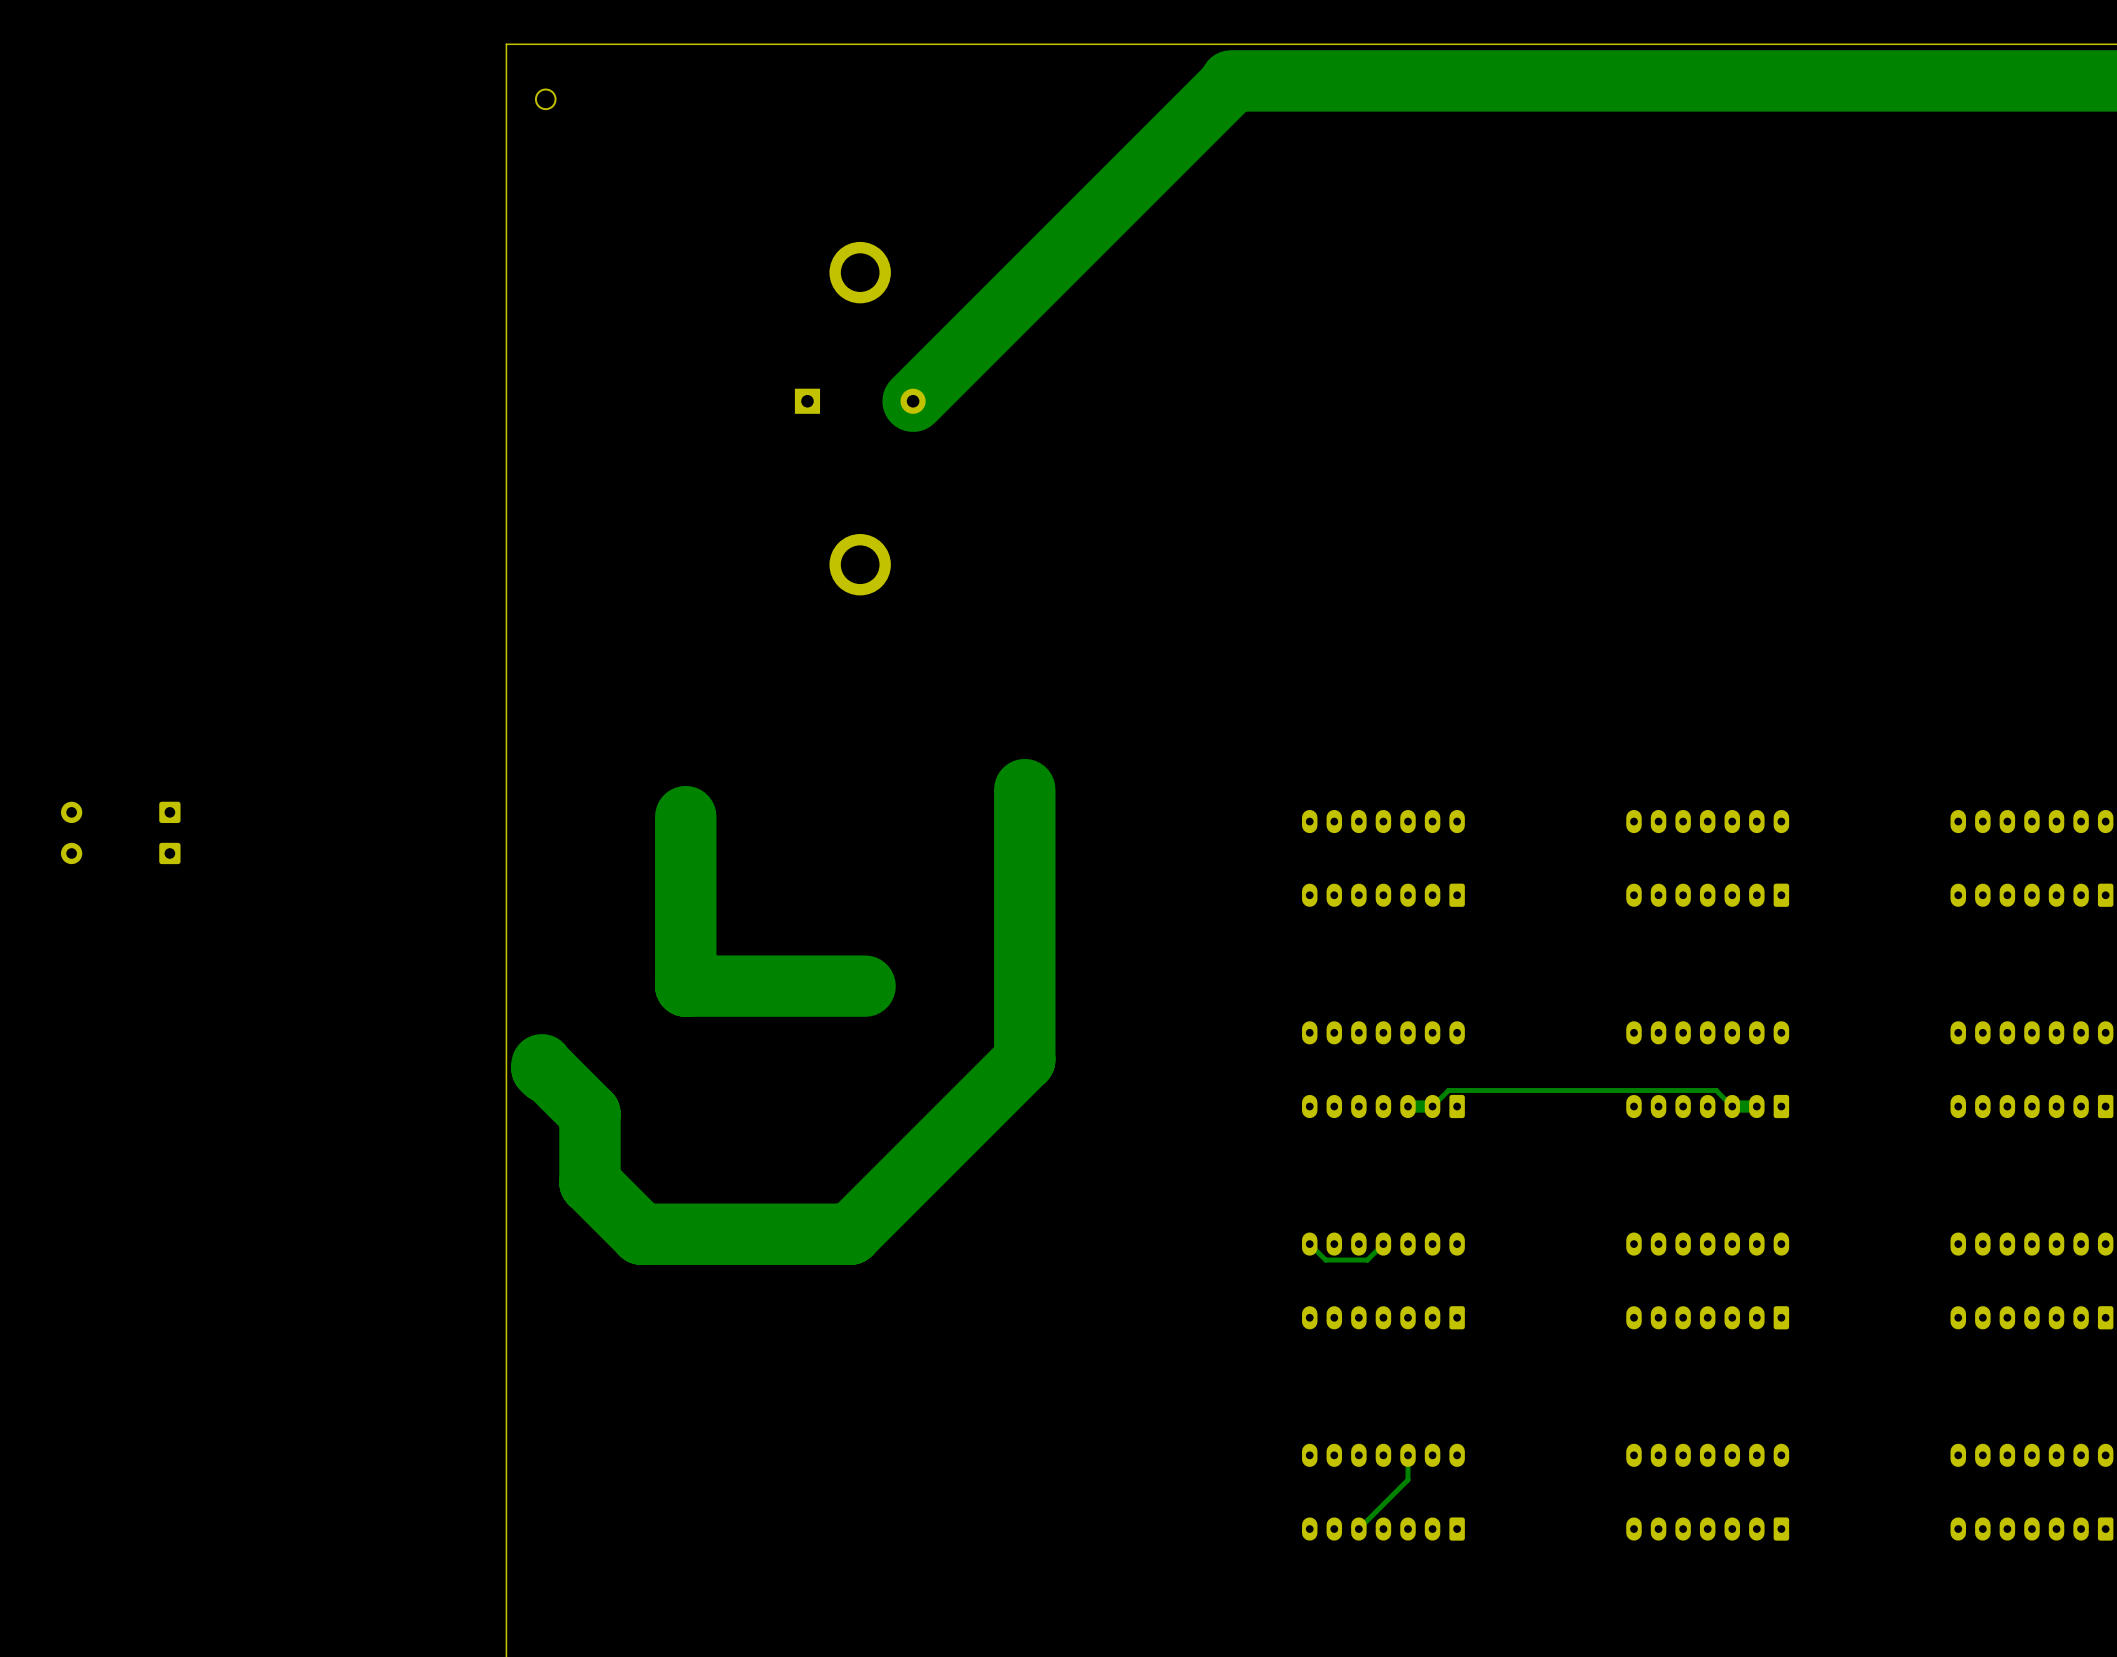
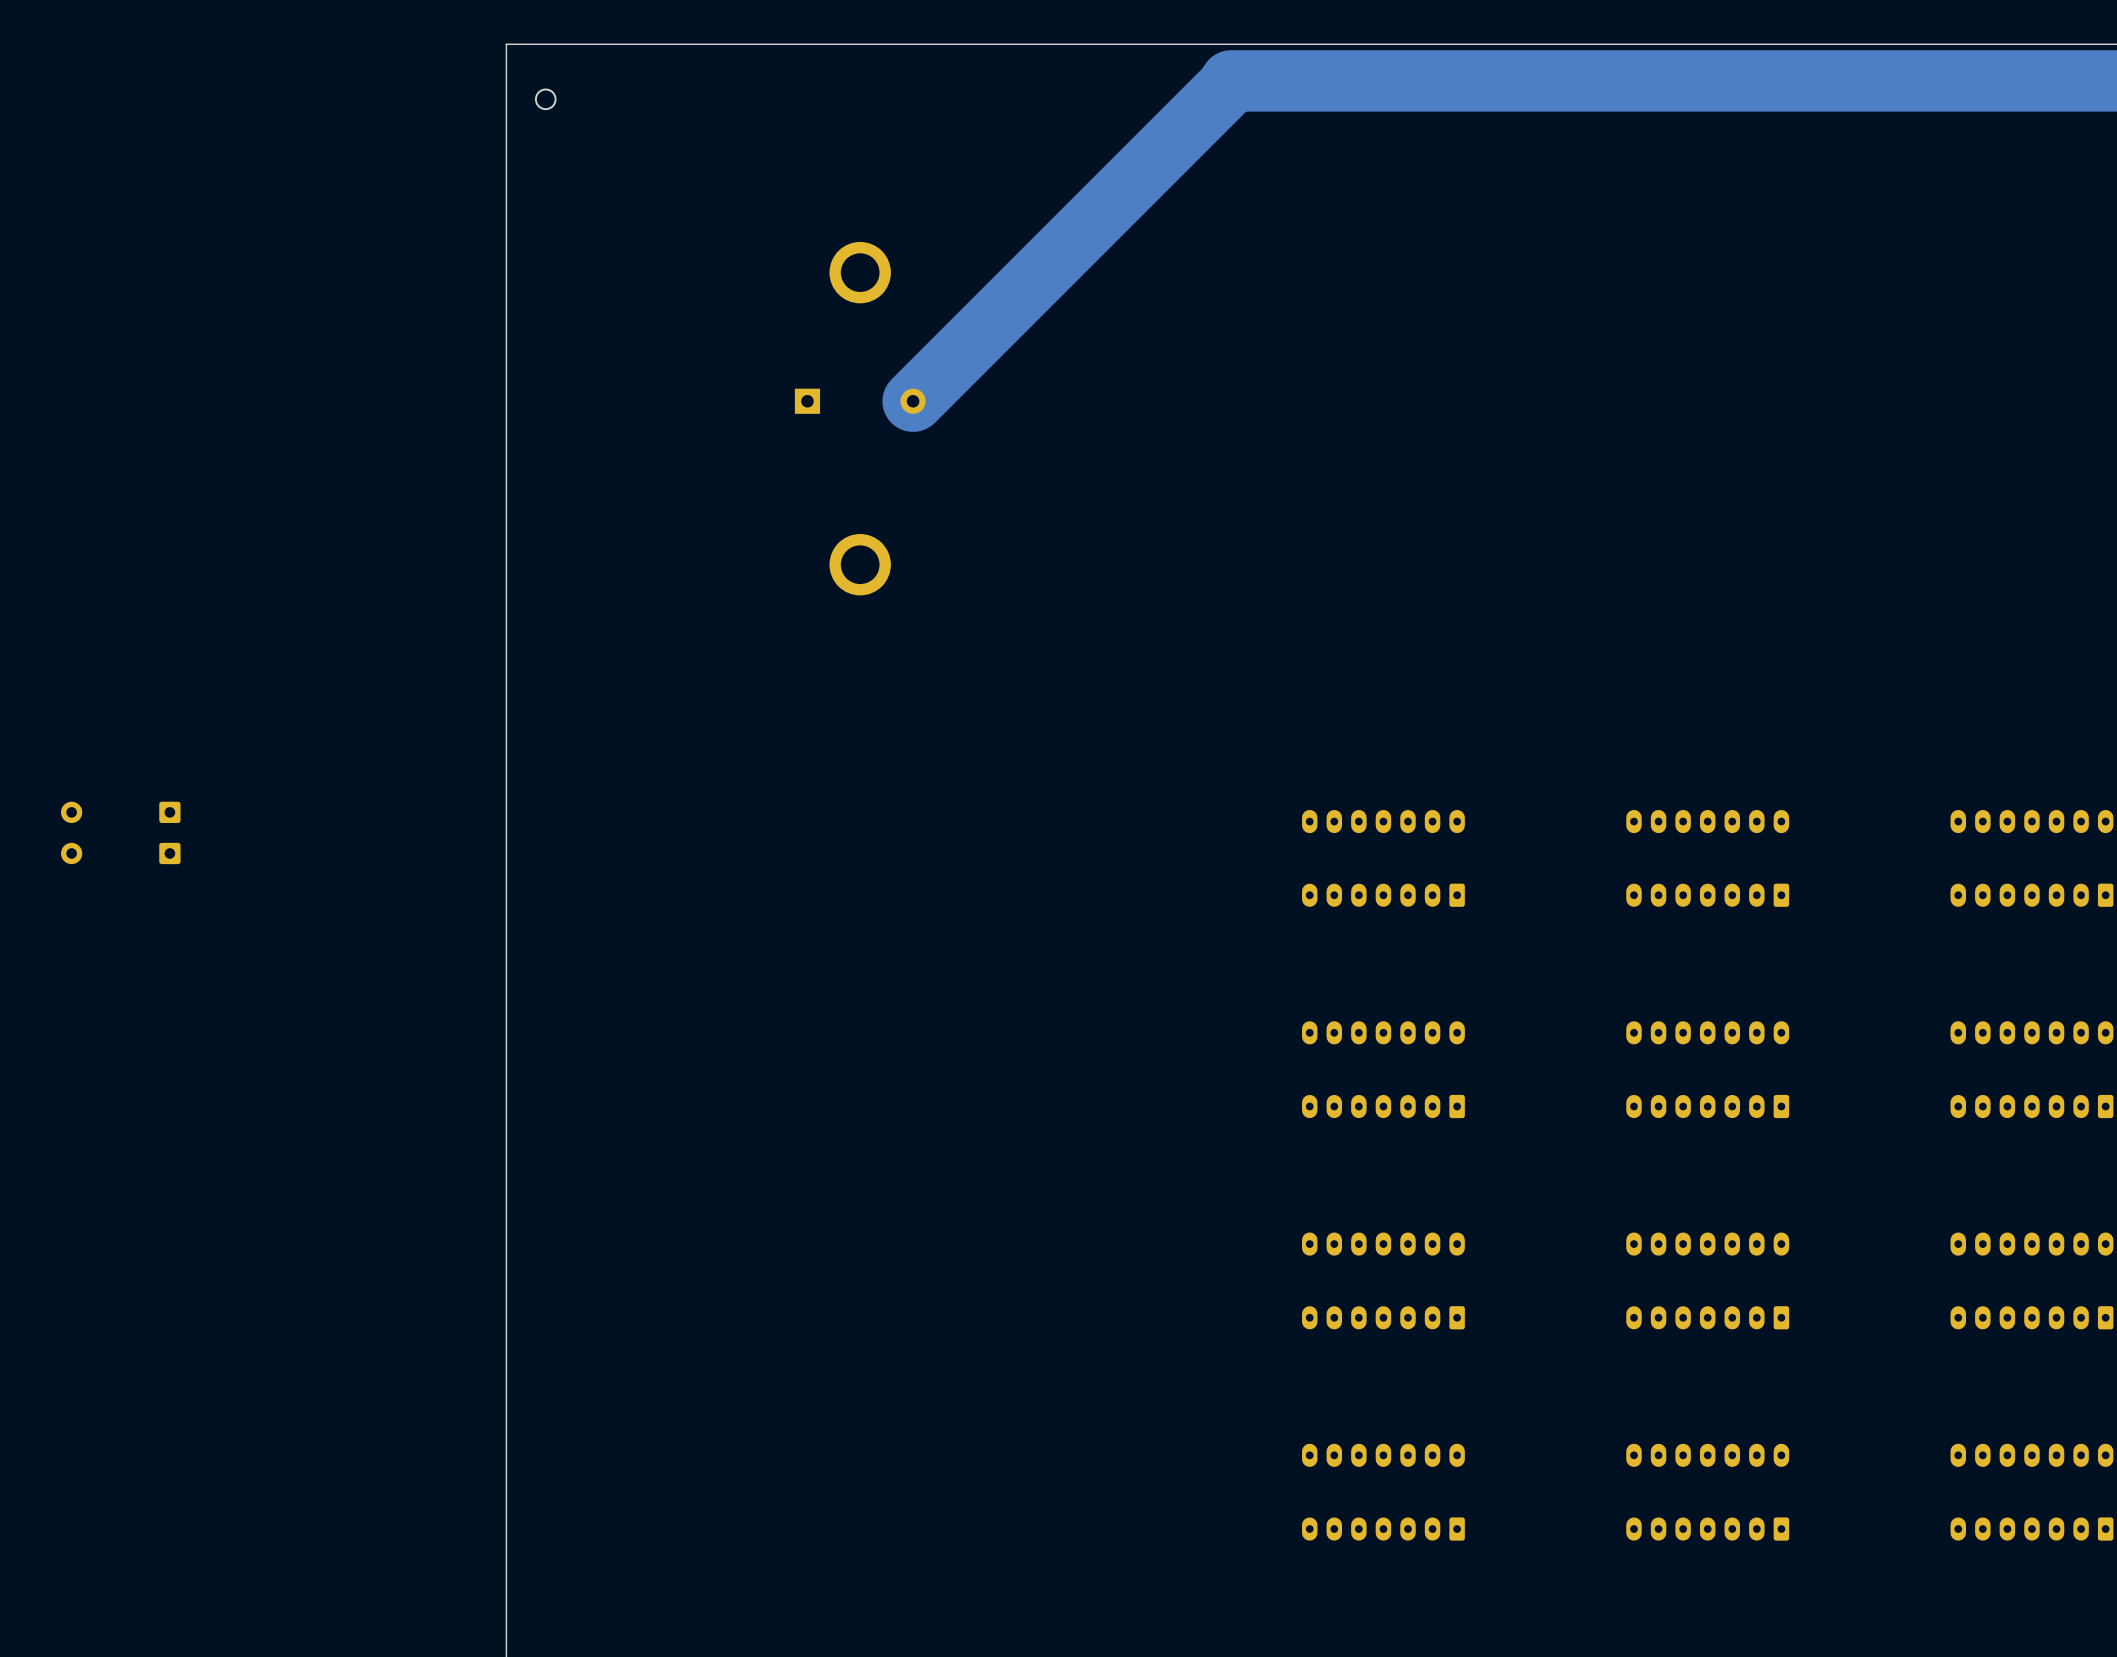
track: (1024, 789) (1024, 1059) (850, 1234) (641, 1234) (589, 1182) (589, 1113) (548, 1072) (541, 1068) (541, 1064) -> none
track: (685, 816) (685, 986) (865, 986) -> none
track: (1756, 1106) (1732, 1106) (1716, 1090) (1448, 1090) (1432, 1106) (1407, 1106) -> none
track: (1383, 1244) (1367, 1260) (1325, 1260) (1309, 1244) -> none
track: (1407, 1455) (1407, 1479) (1358, 1529) -> none

